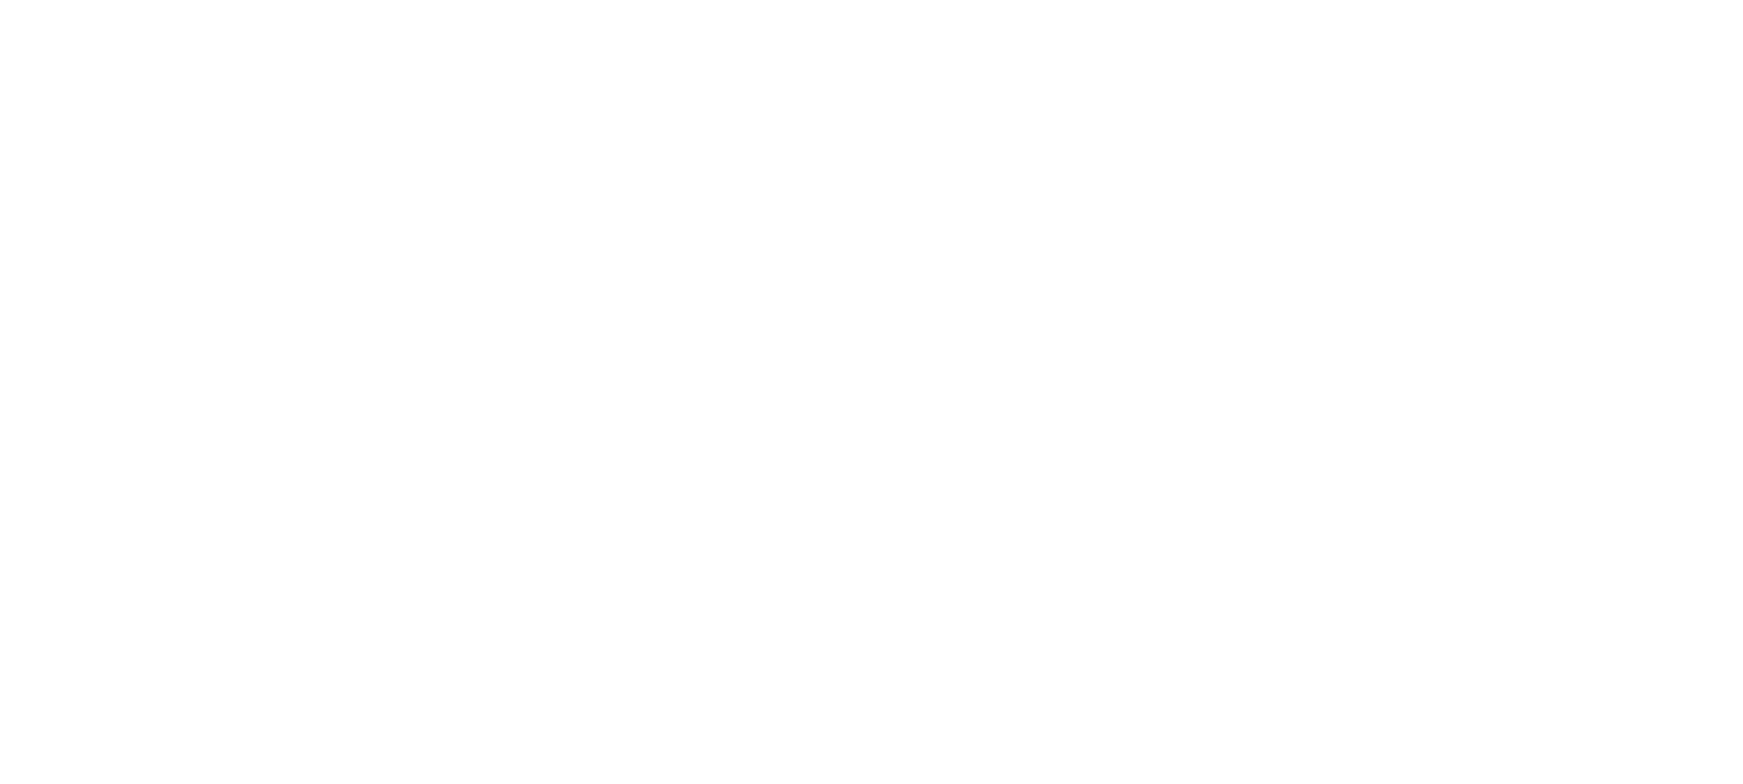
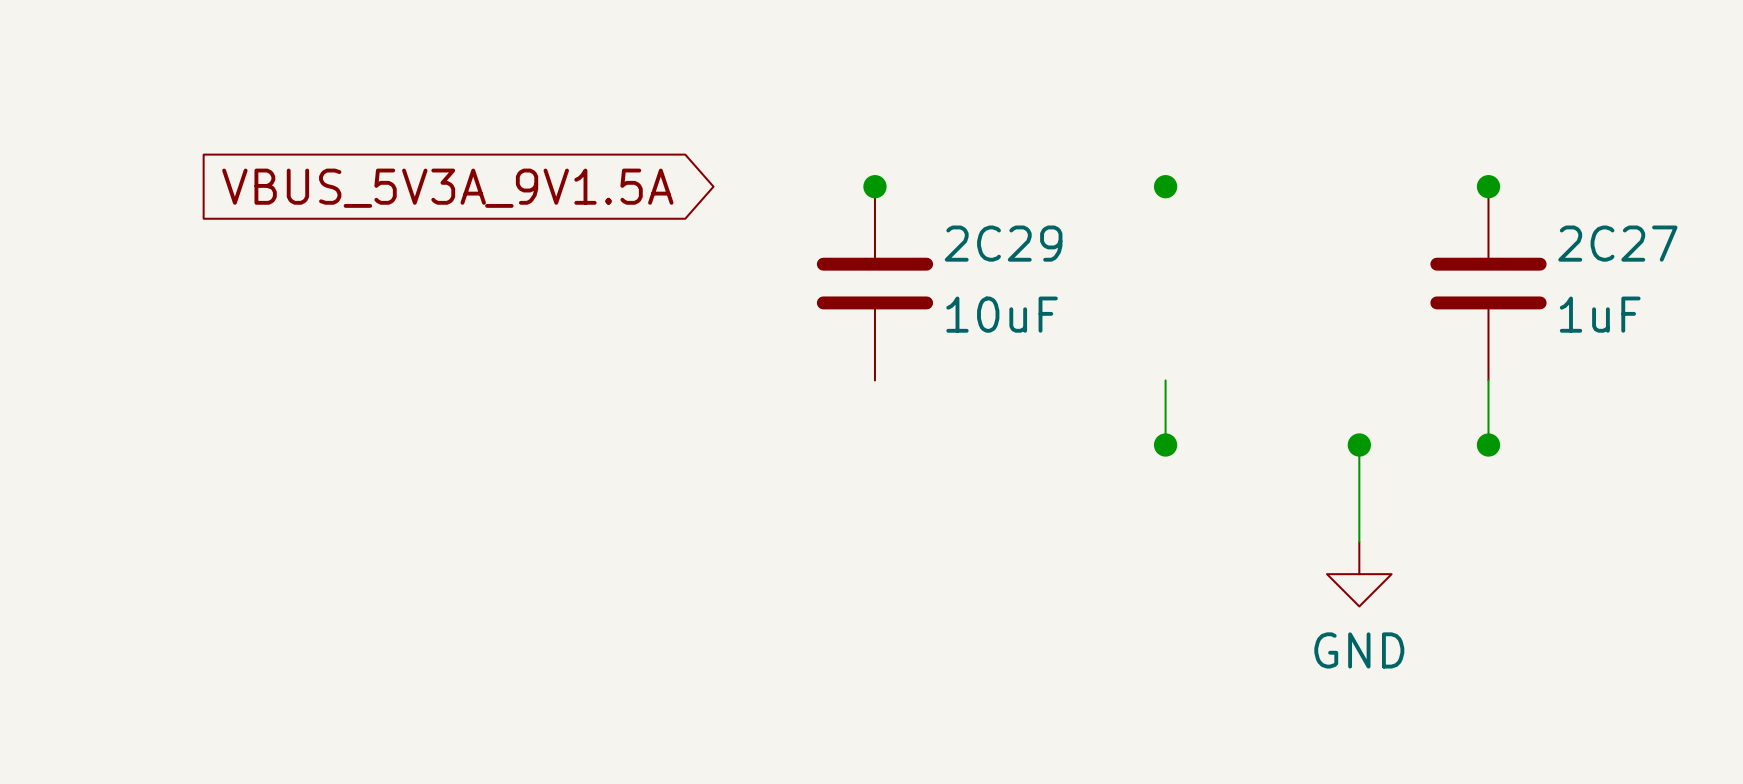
global label: none -> VBUS_5V3A_9V1.5A (447, 188)
junction: none -> (874, 186)
junction: none -> (1165, 186)
junction: none -> (1488, 186)
2C29: none -> 10uF (874, 283)
2C27: none -> 1uF (1488, 283)
wire: none -> (1165, 380) (1165, 445)
wire: none -> (1488, 380) (1488, 445)
junction: none -> (1165, 445)
wire: none -> (1359, 445) (1359, 541)
junction: none -> (1359, 445)
junction: none -> (1488, 445)
power symbol: none -> GND (1359, 574)

